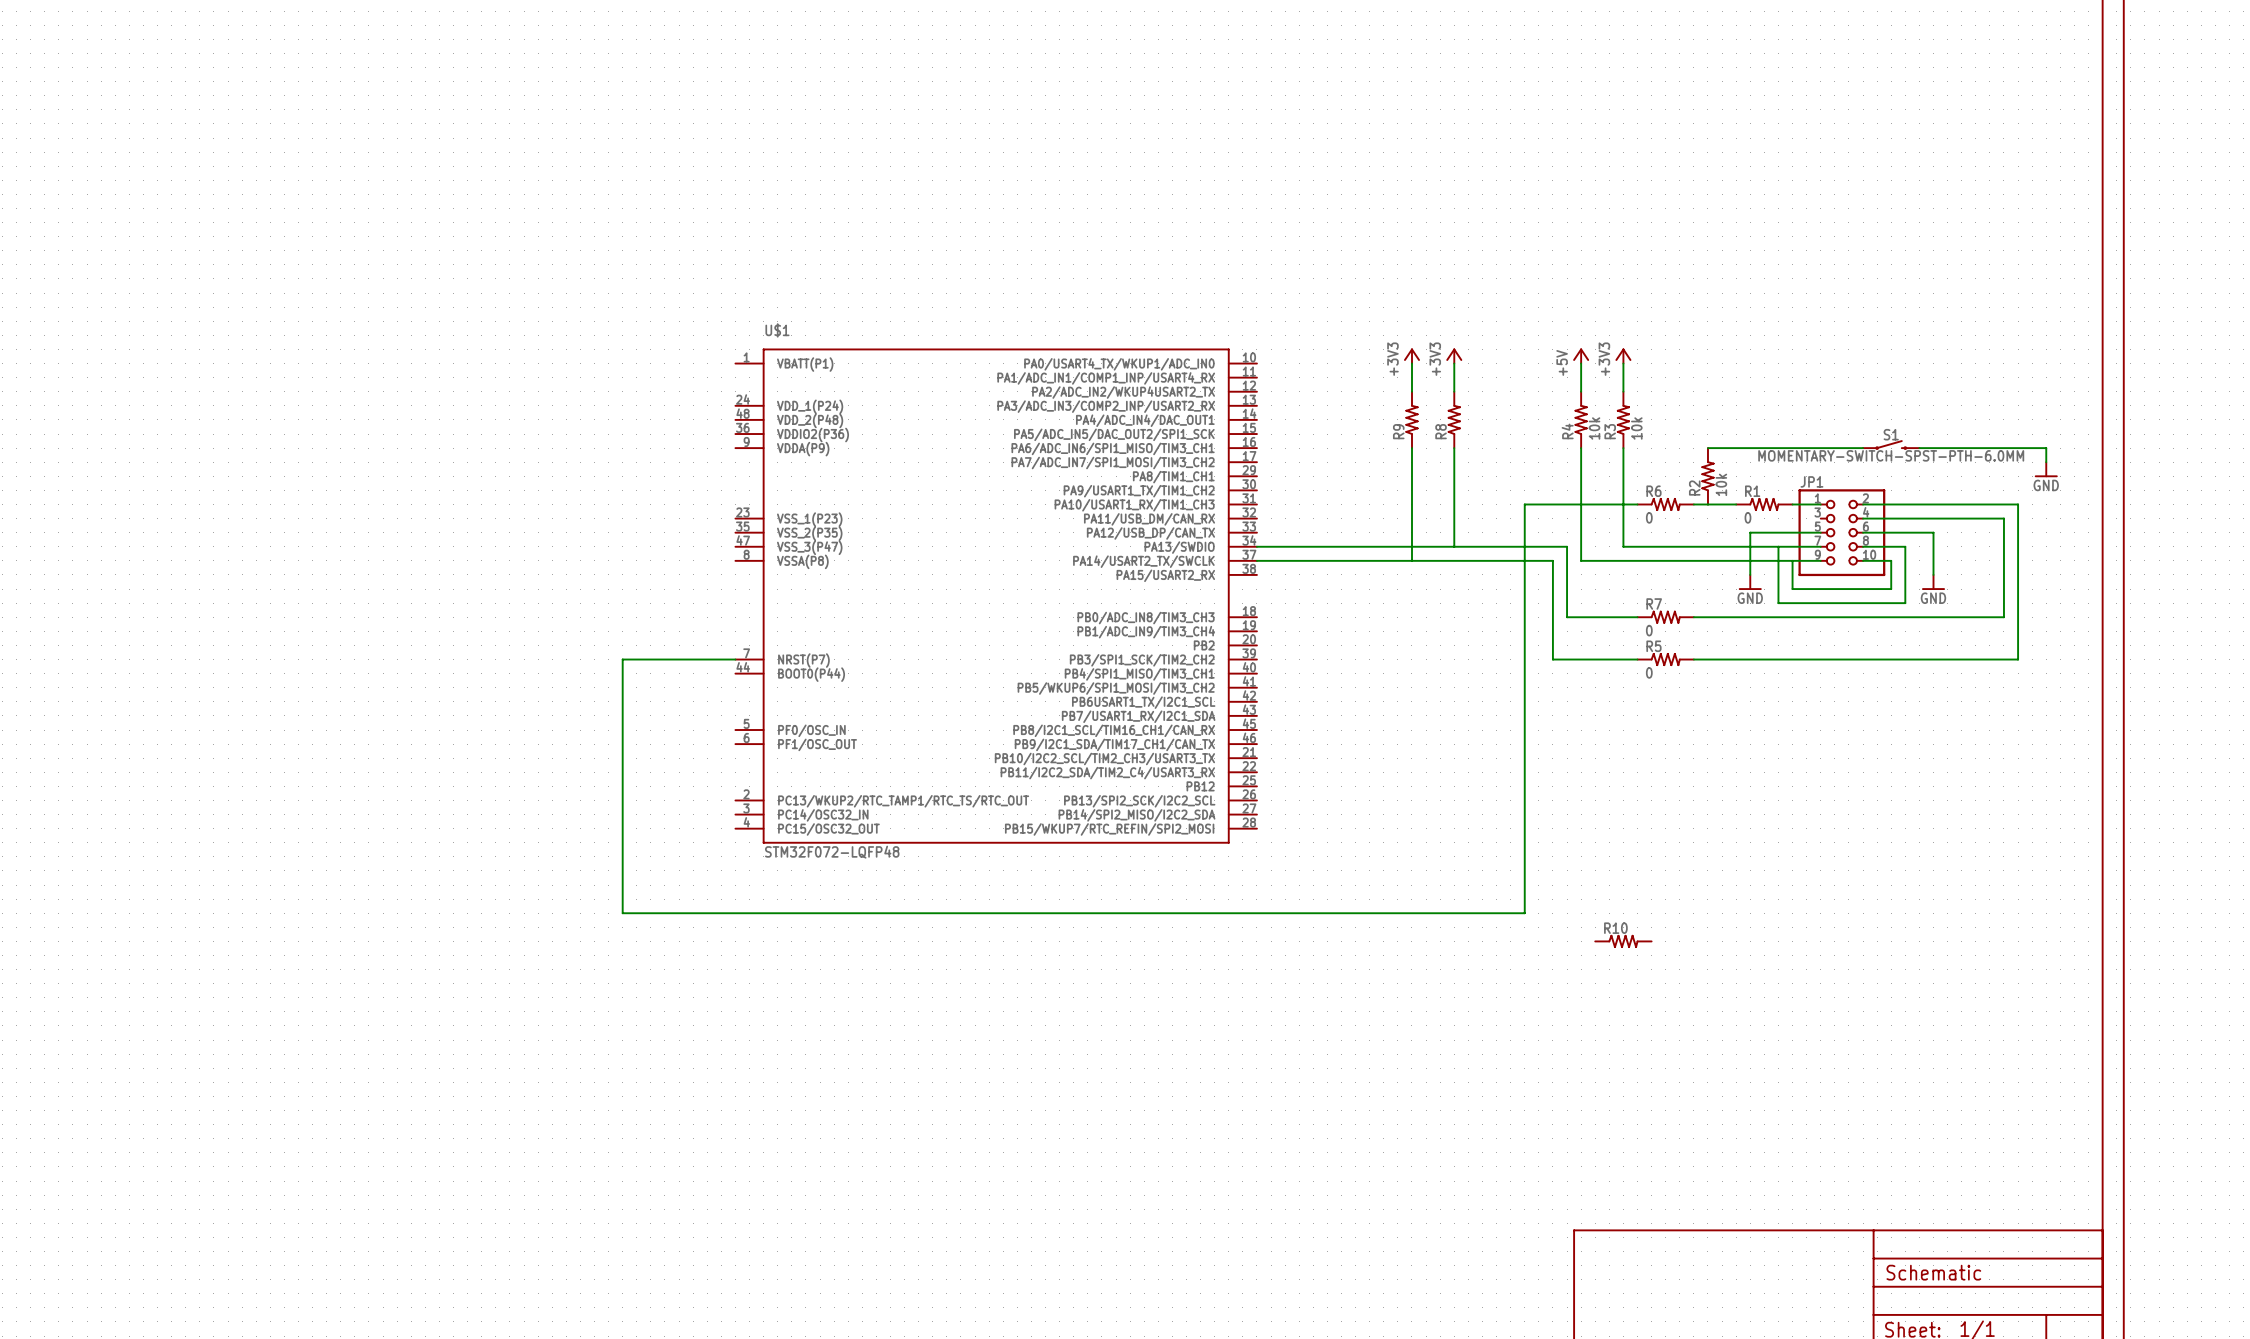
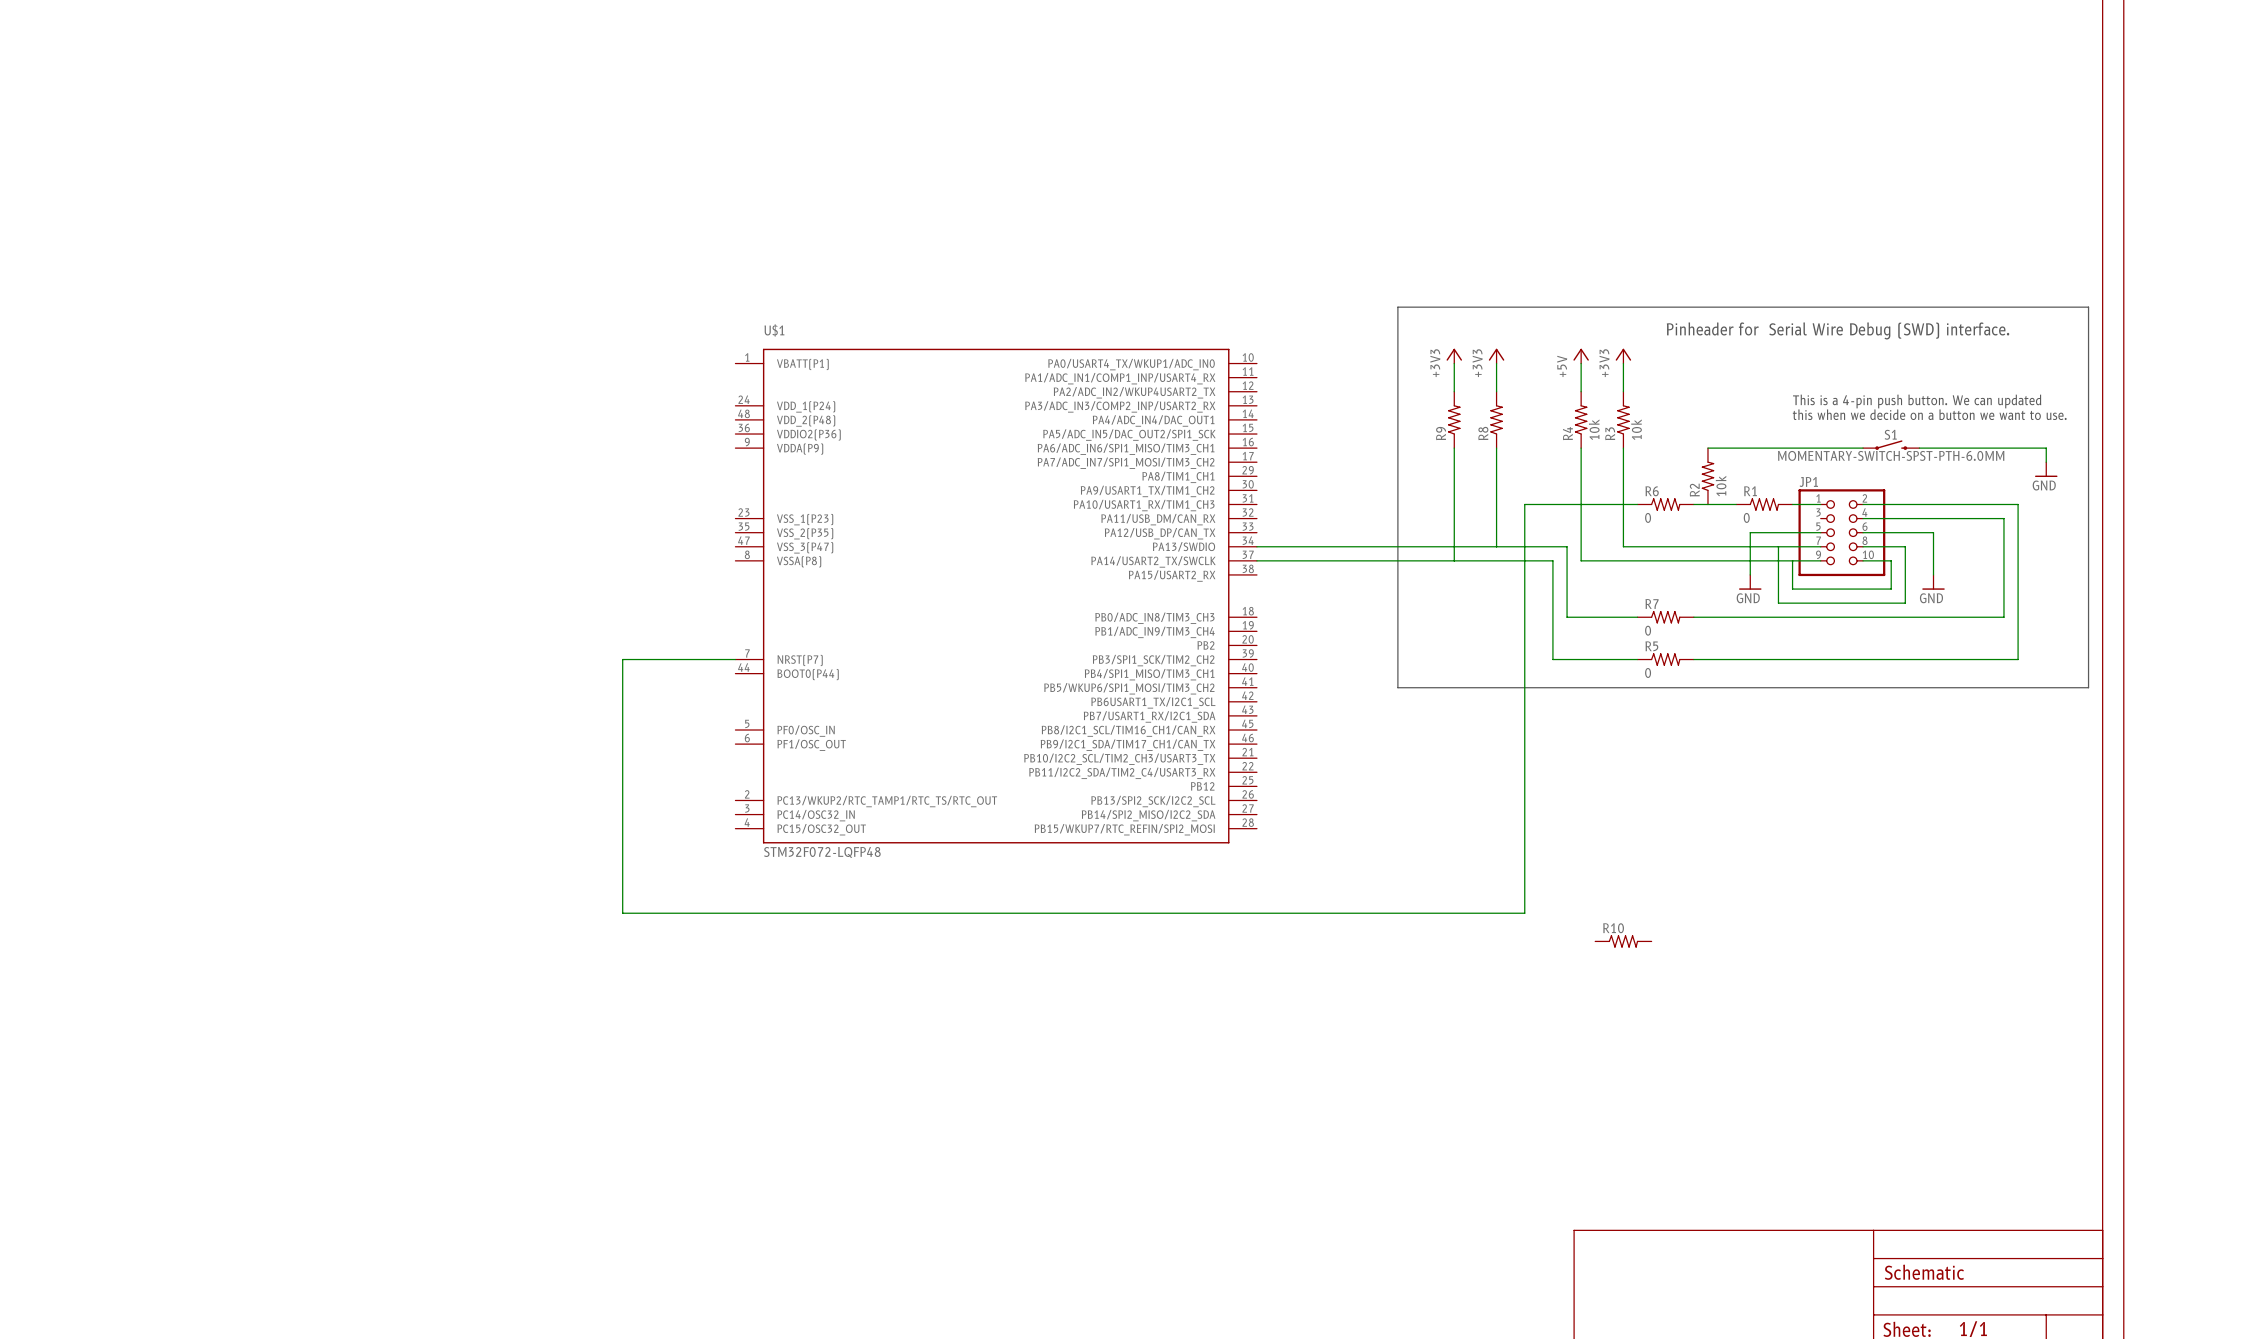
line: none -> (1397, 307) (1397, 687) (2088, 687) (2088, 307) (1397, 307)
text: none -> Pinheader for Serial Wire Debug (SWD) interface. (1838, 330)
power symbol position: +3V3 (1411, 356) -> +3V3 (1496, 356)
wire: (1411, 363) (1411, 391) -> (1496, 363) (1496, 391)
text: none -> This is a 4-pin push button. We can updated (1917, 401)
text: none -> this when we decide on a button we want to use. (1929, 414)
R9: (1411, 419) -> none
R8: none -> (1496, 419)
R8 name: R8 (1441, 431) -> R9 (1441, 433)
wire: (1411, 448) (1411, 560) -> none
wire: none -> (1496, 448) (1496, 546)
wire: none -> (1454, 546) (1454, 560)

